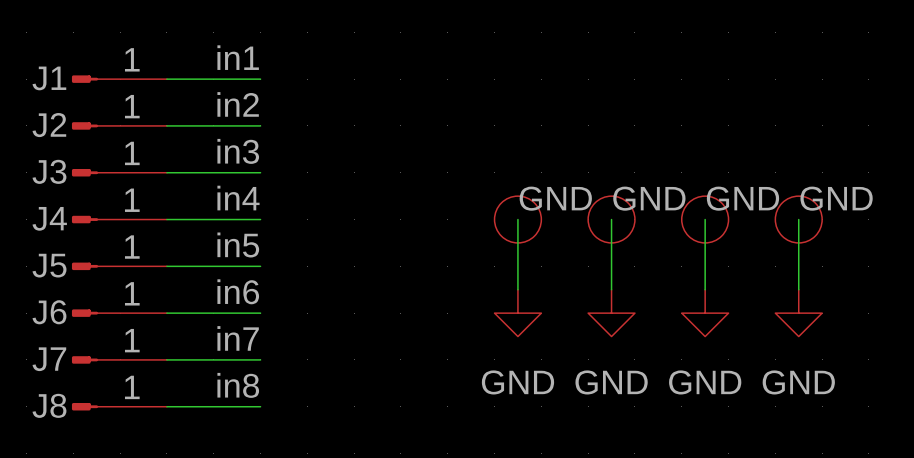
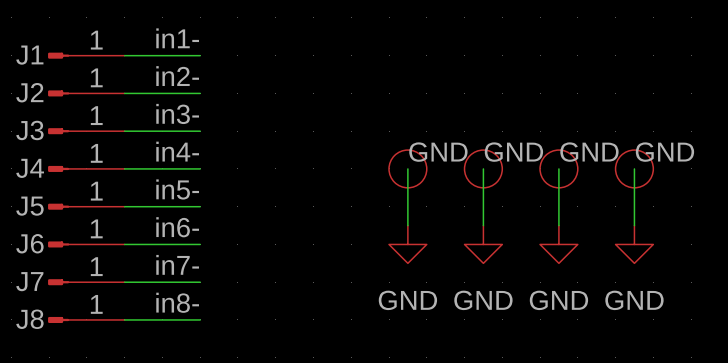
label: in1 (238, 57) -> in1- (177, 38)
label: in2 (238, 104) -> in2- (177, 76)
label: in3 (238, 151) -> in3- (177, 113)
label: in4 (238, 198) -> in4- (177, 151)
label: in5 (238, 245) -> in5- (177, 189)
label: in6 (238, 291) -> in6- (177, 227)
label: in7 (238, 338) -> in7- (177, 264)
label: in8 (238, 385) -> in8- (177, 302)

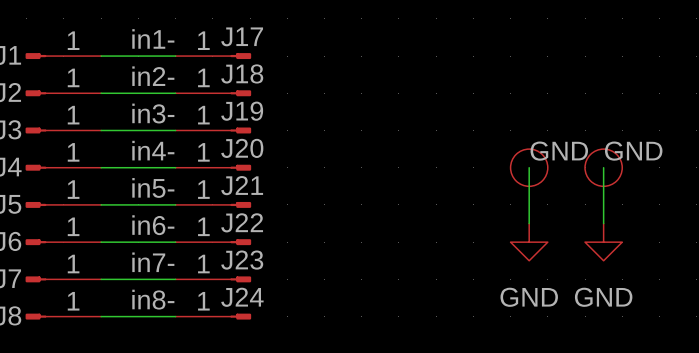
J17: none -> (213, 56)
J18: none -> (213, 93)
J19: none -> (213, 130)
label: GND (438, 152) -> none
label: GND (513, 152) -> none
J20: none -> (213, 167)
wire: (407, 168) (407, 225) -> none
part: (407, 168) -> none
wire: (483, 168) (483, 225) -> none
part: (483, 168) -> none
J21: none -> (213, 204)
J22: none -> (213, 242)
power symbol: GND (407, 244) -> none
power symbol: GND (483, 244) -> none
J23: none -> (213, 279)
J24: none -> (213, 316)

